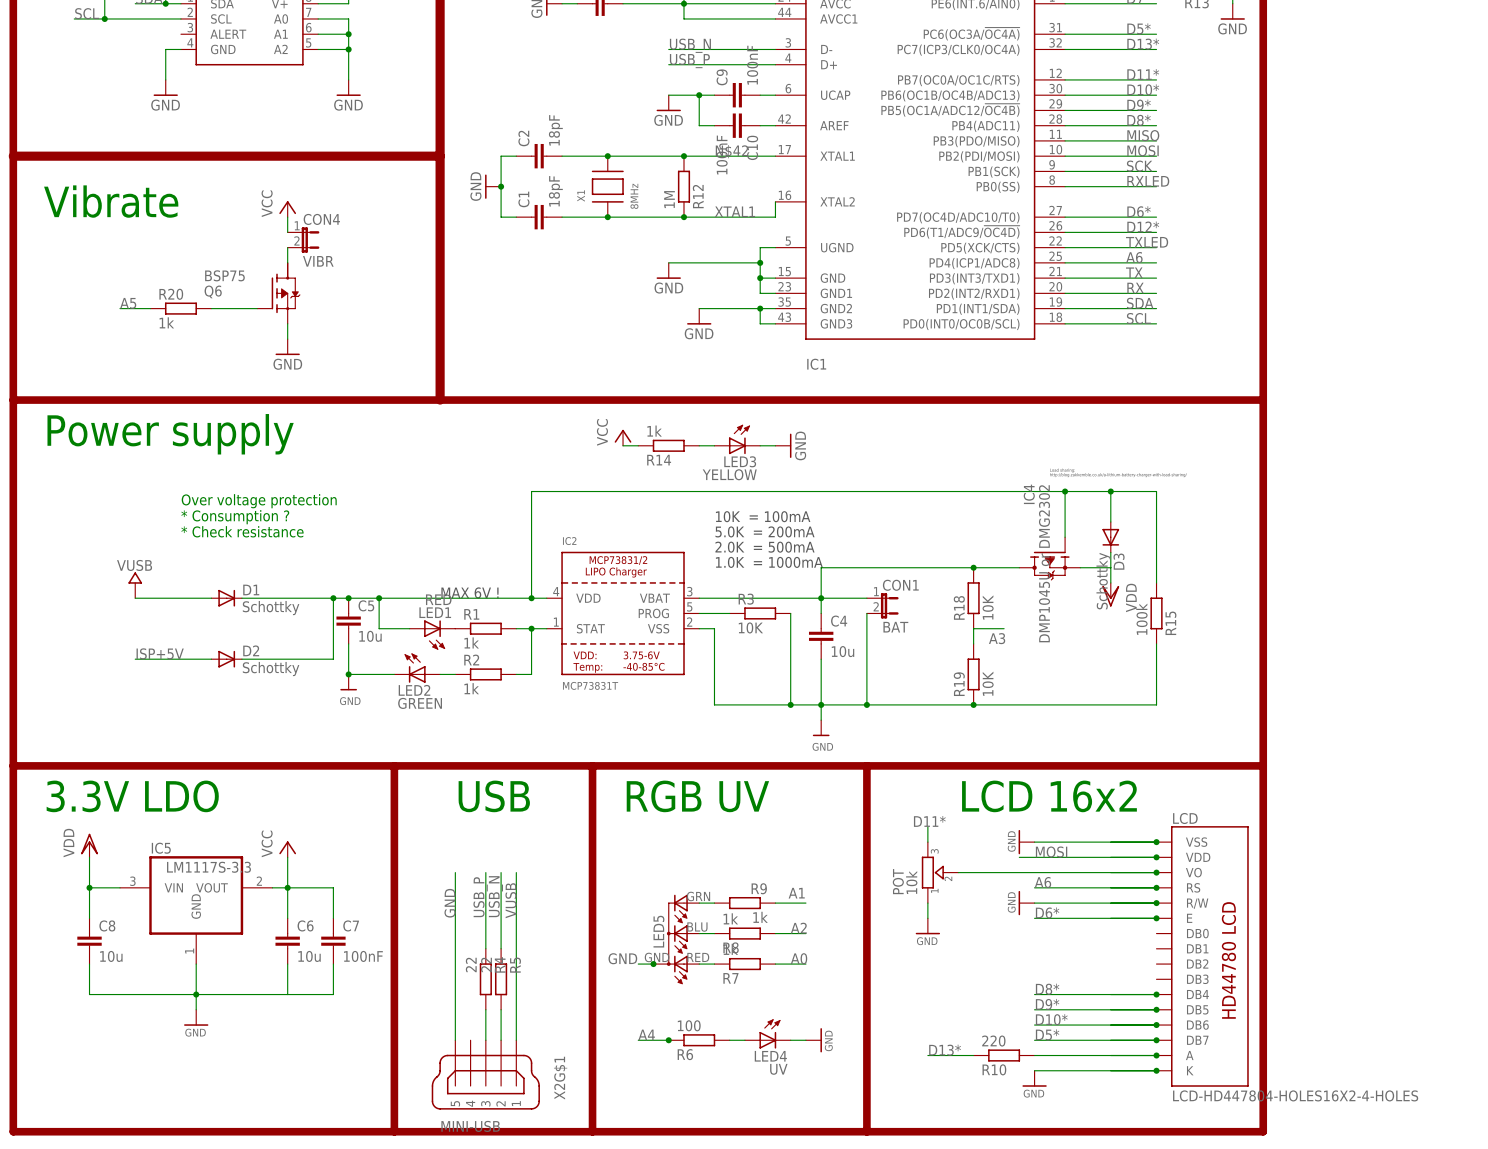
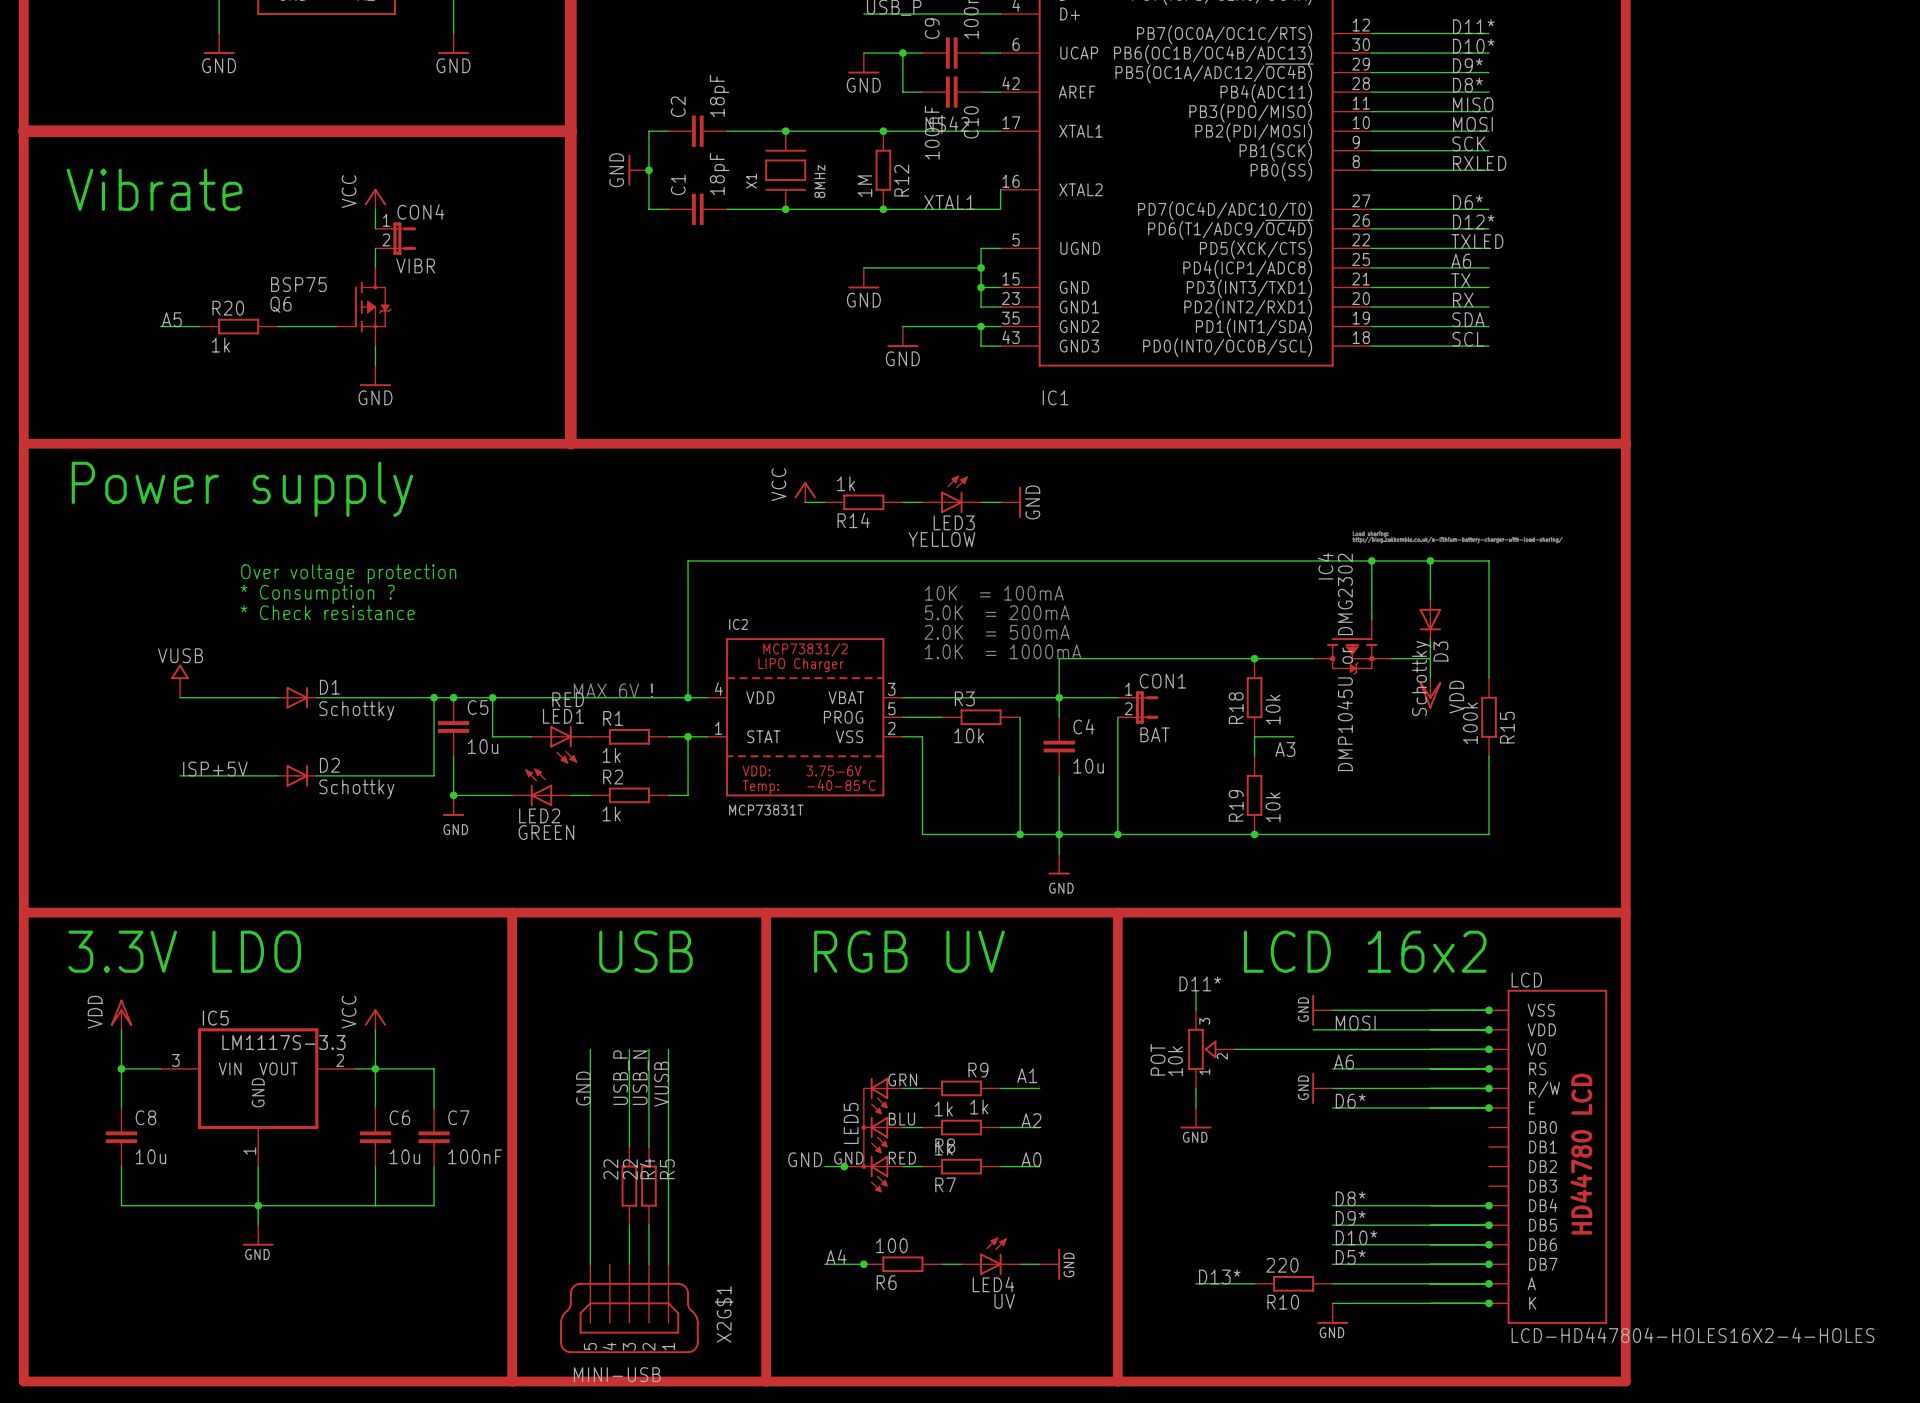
R18 value: 10K (988, 607) -> 10k (1273, 709)
R3 value: 10K (750, 627) -> 10k (969, 735)
R19 value: 10K (988, 683) -> 10k (1273, 807)

